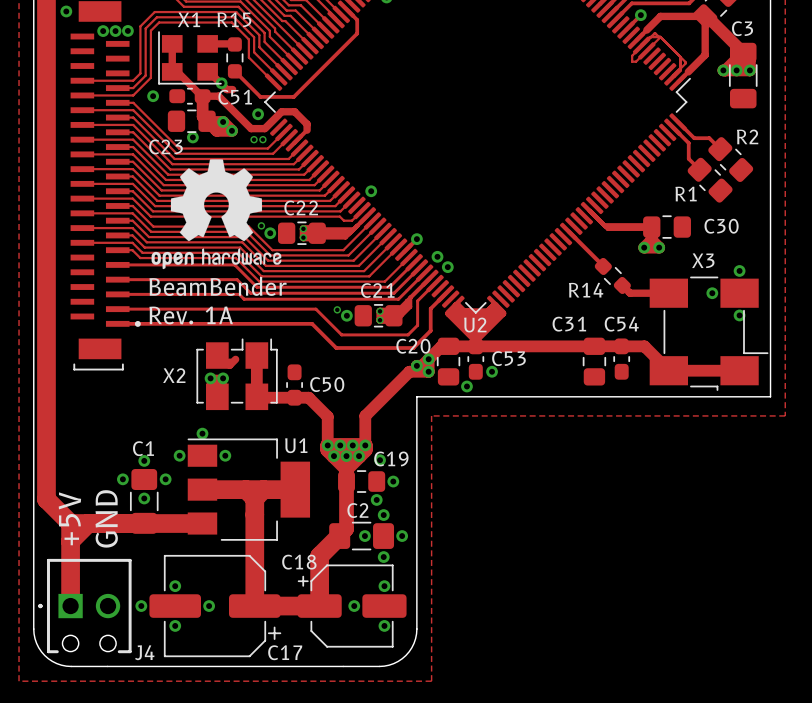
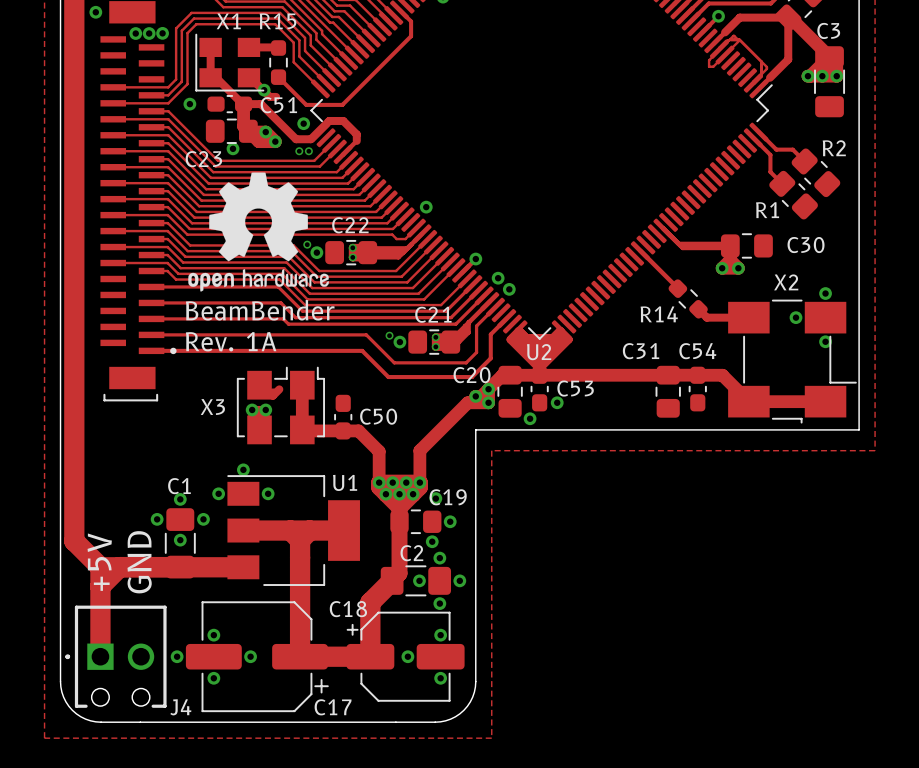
X3 name: X3 (703, 260) -> X2 (786, 282)
X2 name: X2 (174, 375) -> X3 (212, 406)

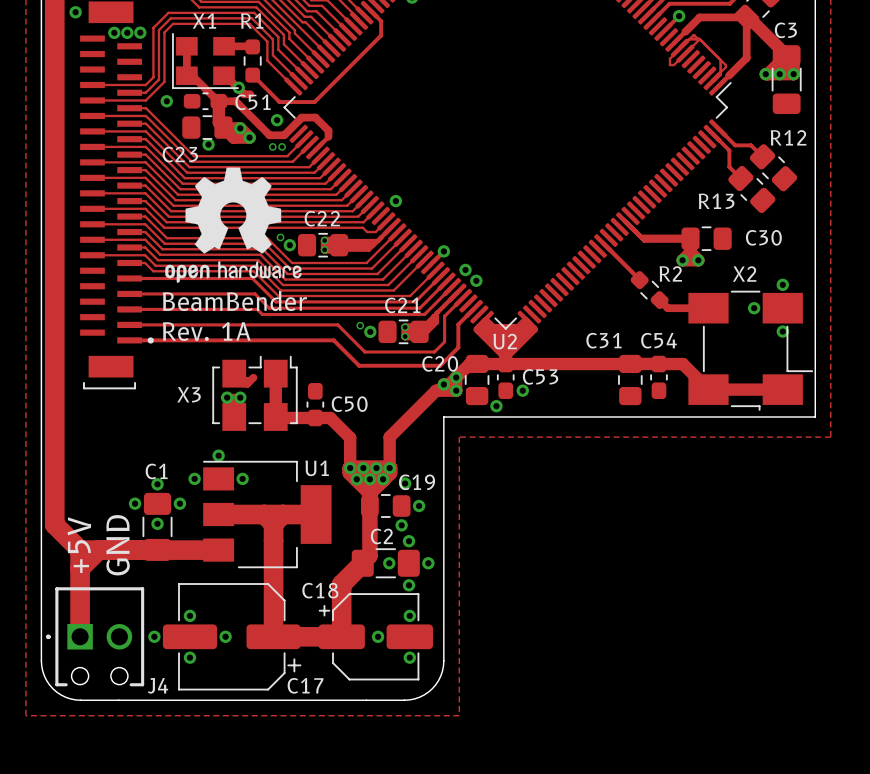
R15 name: R15 (278, 21) -> R1 (252, 20)
R2 name: R2 (834, 148) -> R12 (788, 137)
R1 name: R1 (767, 210) -> R13 (716, 201)
R14 name: R14 (659, 314) -> R2 (670, 273)

